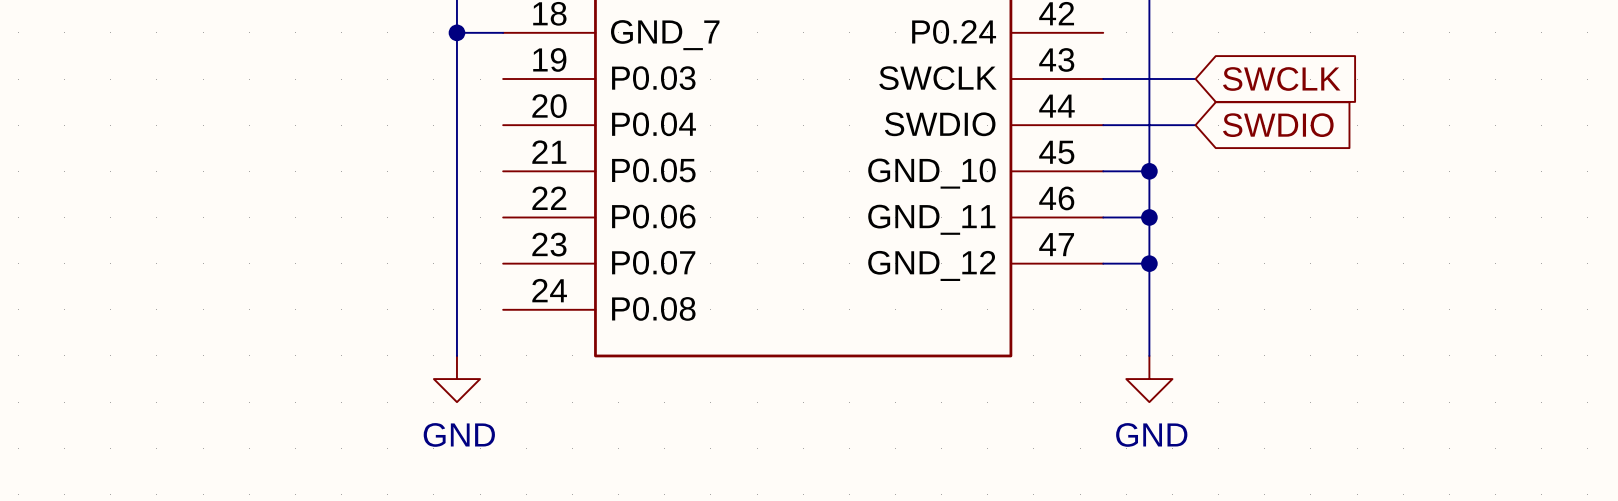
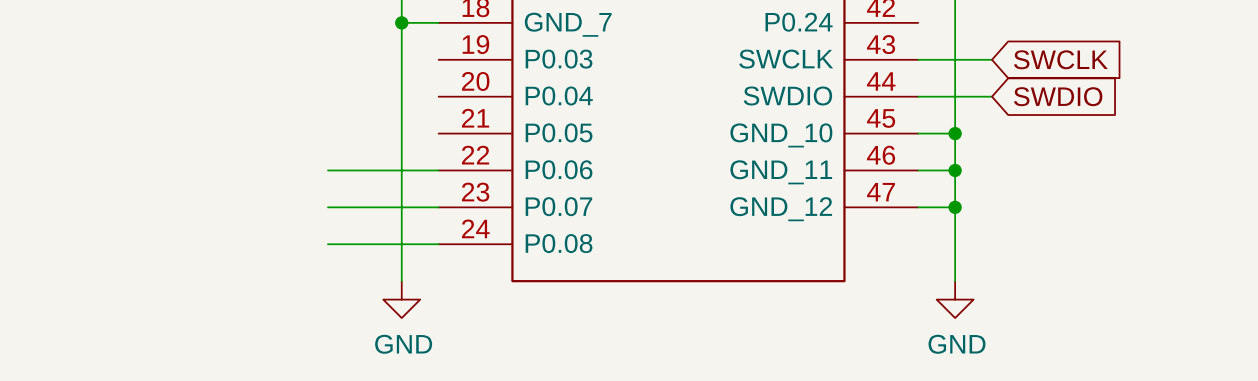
wire: none -> (327, 170) (438, 170)
wire: none -> (327, 207) (438, 207)
wire: none -> (327, 244) (438, 244)

